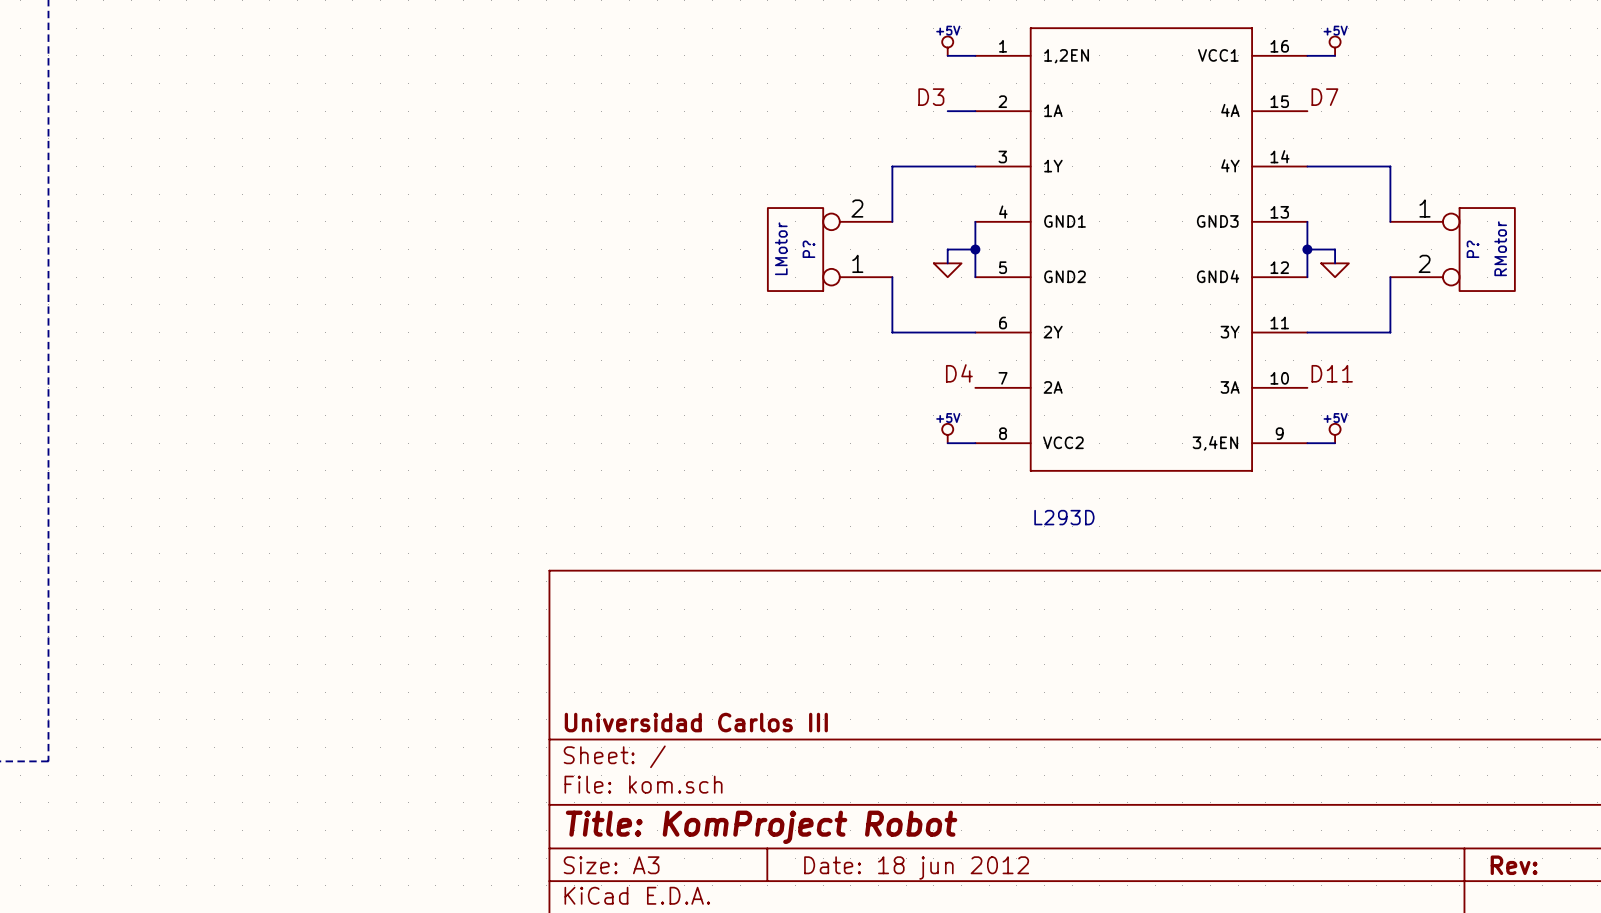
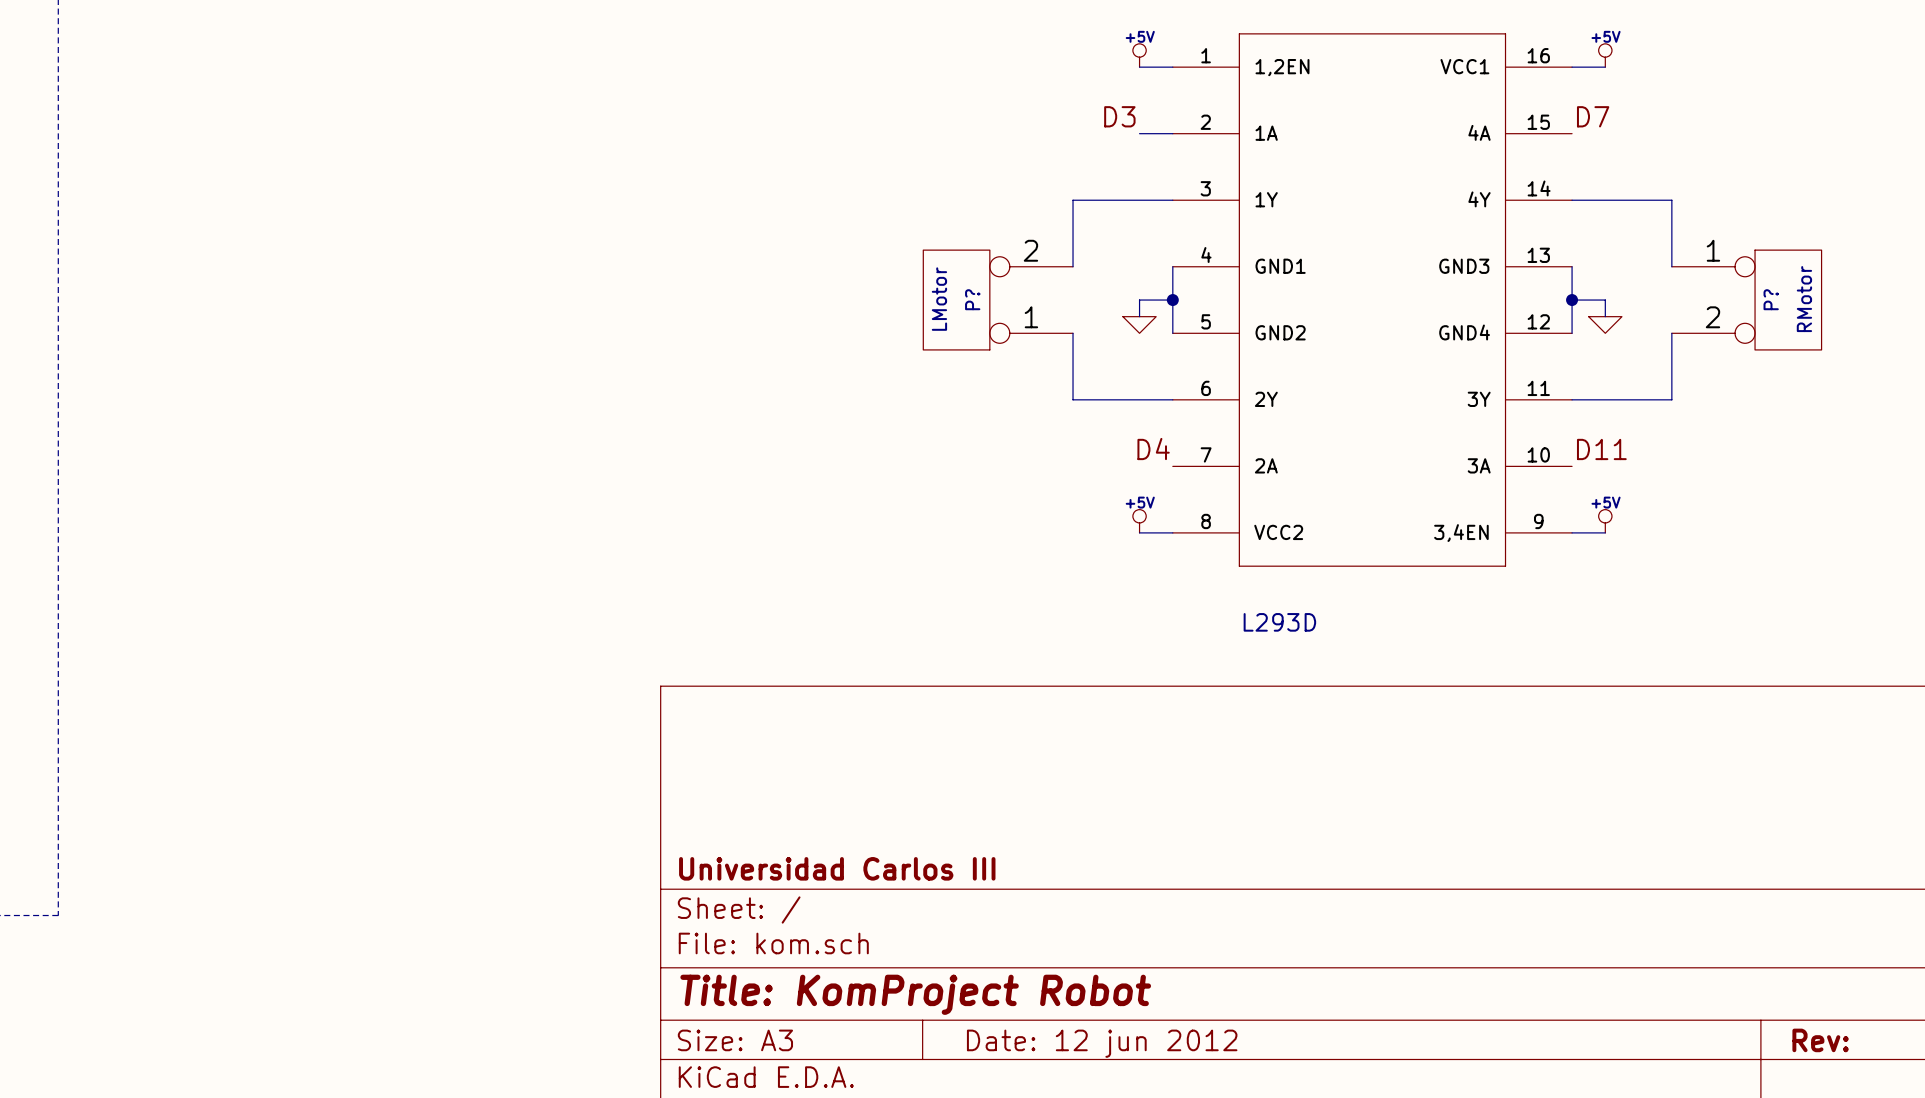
title block: Date: 18 jun 2012 (916, 867) -> Date: 12 jun 2012 (1102, 1043)

